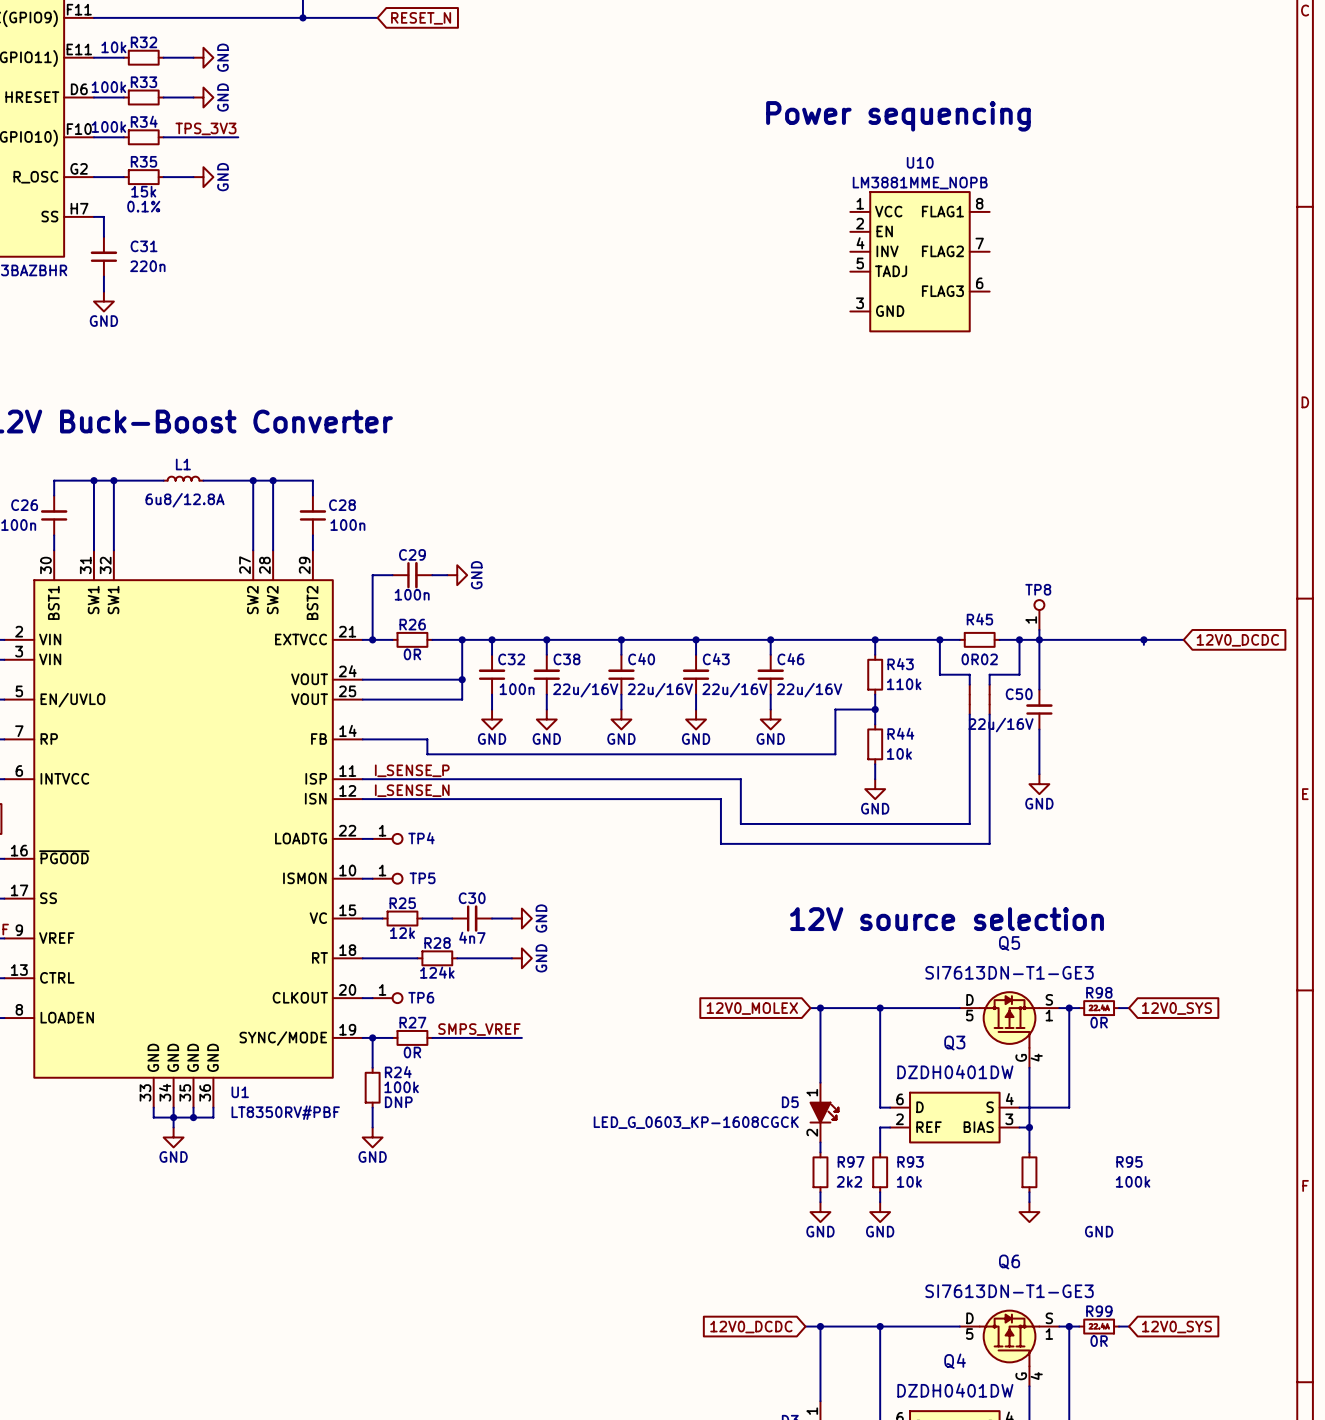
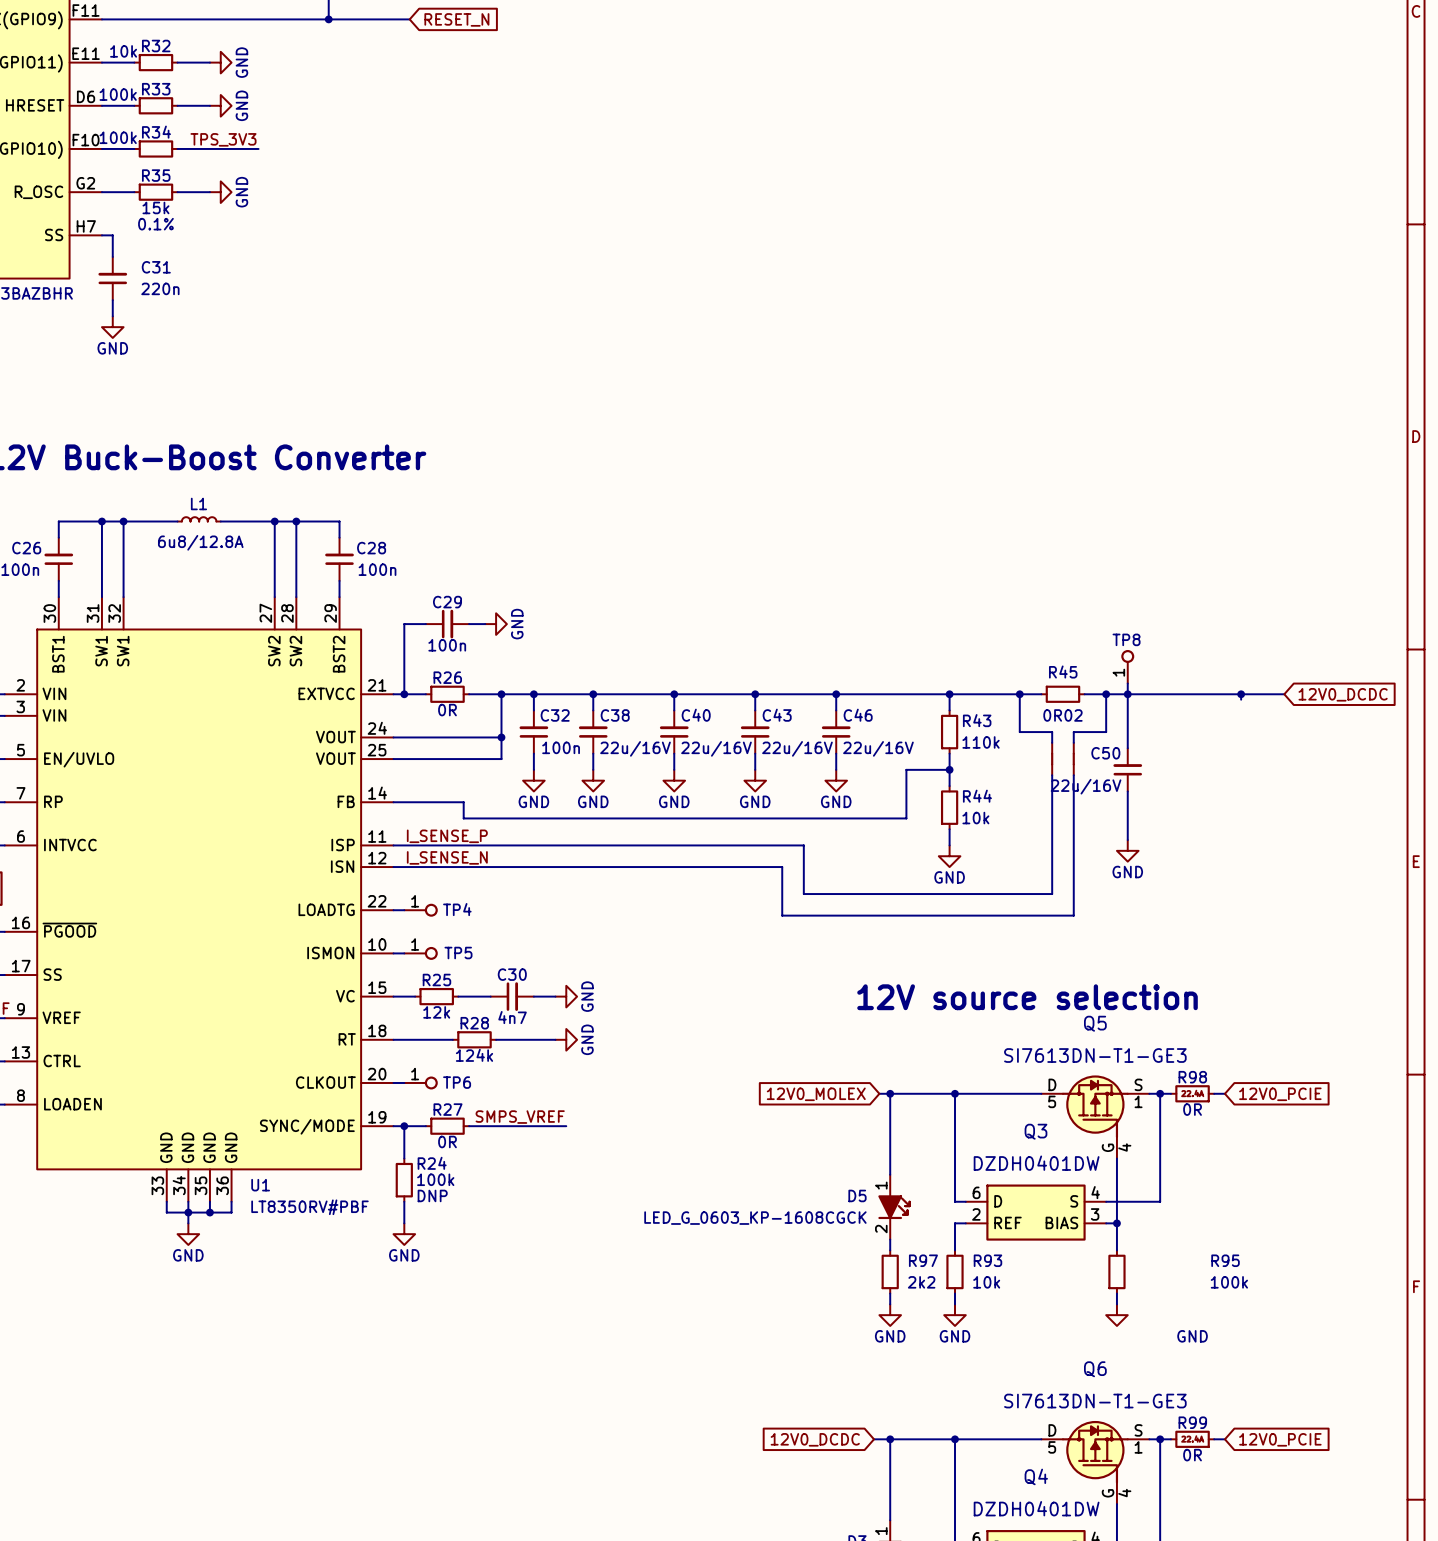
text: Power sequencing (898, 116) -> none
U10: LM3881MME_NOPB (919, 261) -> none
global label: 12V0_SYS (1176, 1008) -> 12V0_PCIE (1280, 1094)
global label: 12V0_SYS (1176, 1327) -> 12V0_PCIE (1280, 1439)

